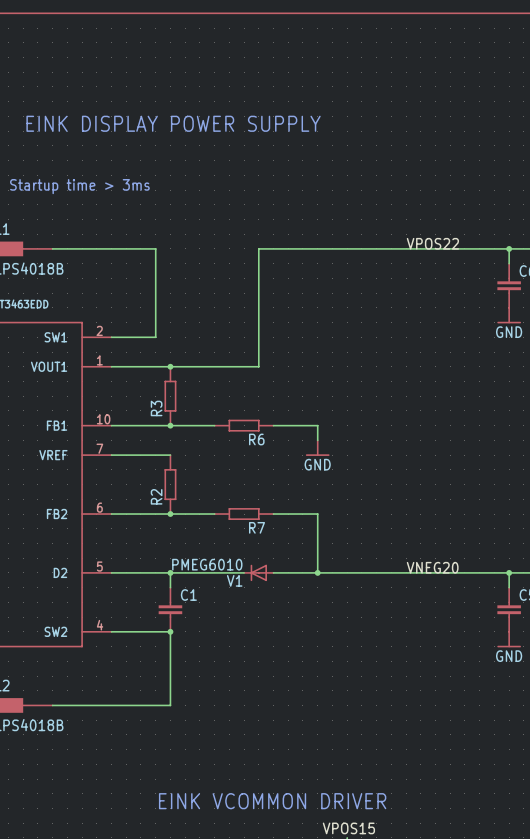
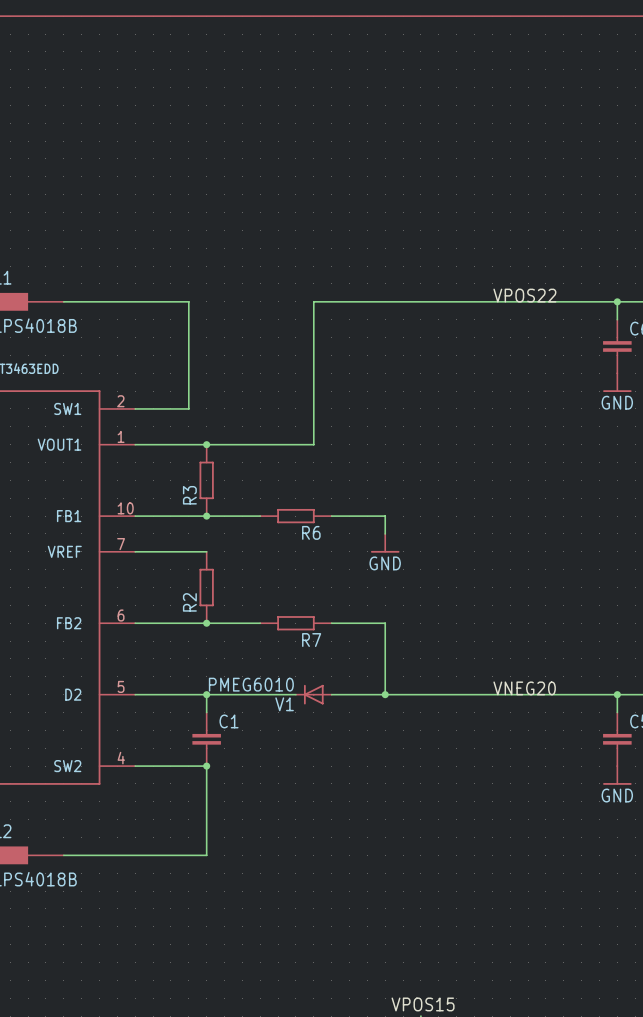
text: EINK DISPLAY POWER SUPPLY (173, 123) -> none
text: Startup time > 3ms (79, 186) -> none
text: EINK VCOMMON DRIVER (272, 801) -> none

